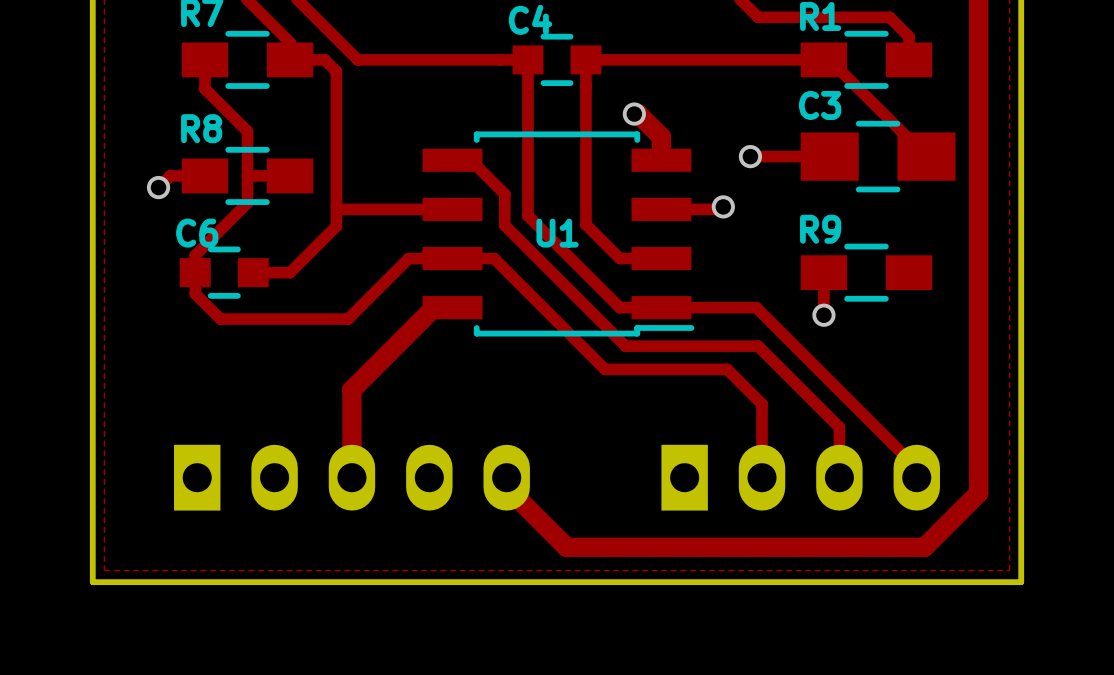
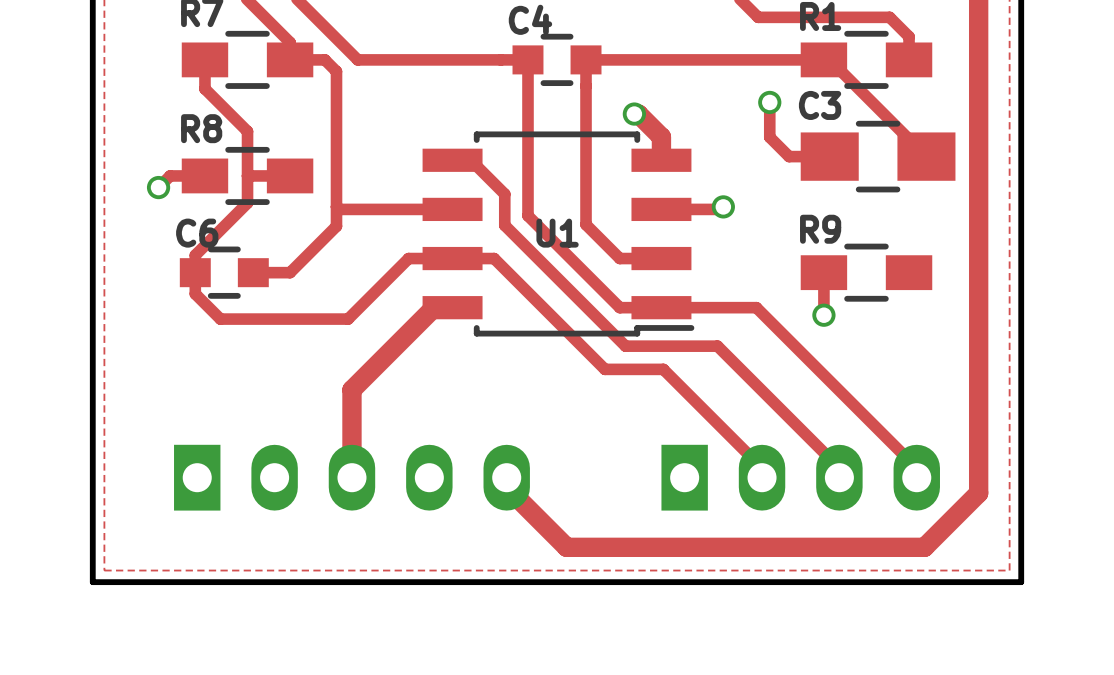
track: (750, 156) (789, 156) -> (769, 102) (769, 137) (789, 156)
via position: (750, 156) -> (769, 102)
track: (717, 346) (758, 346) (839, 427) (839, 468) -> (717, 346) (839, 468)
track: (663, 369) (727, 369) (762, 404) (762, 468) -> (663, 369) (762, 468)

